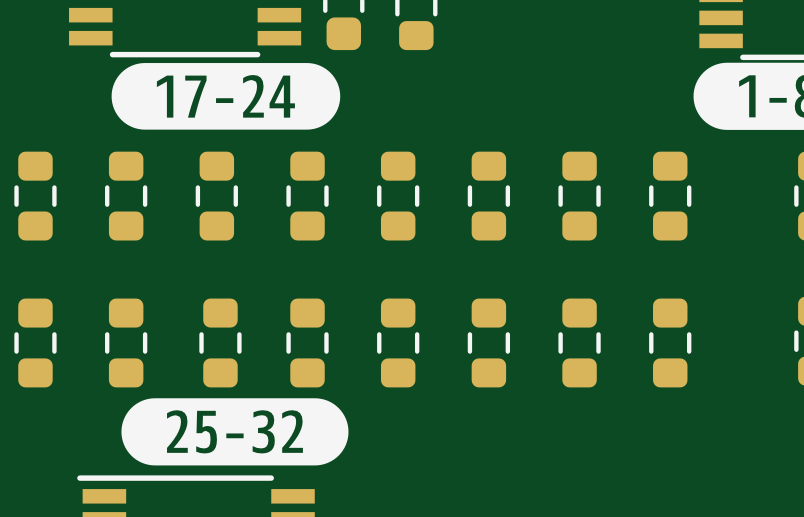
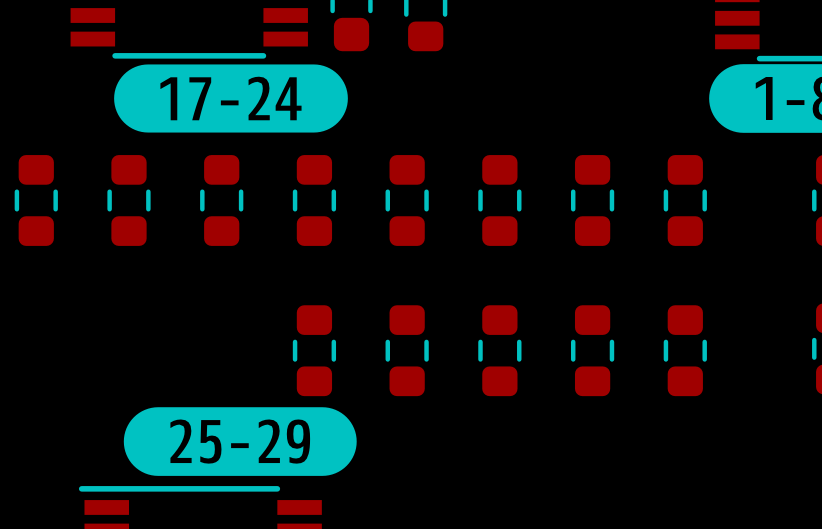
part: (35, 342) -> none
part: (126, 342) -> none
part: (220, 342) -> none
drawing shape: [121, 398, 349, 466] -> [123, 407, 357, 476]

